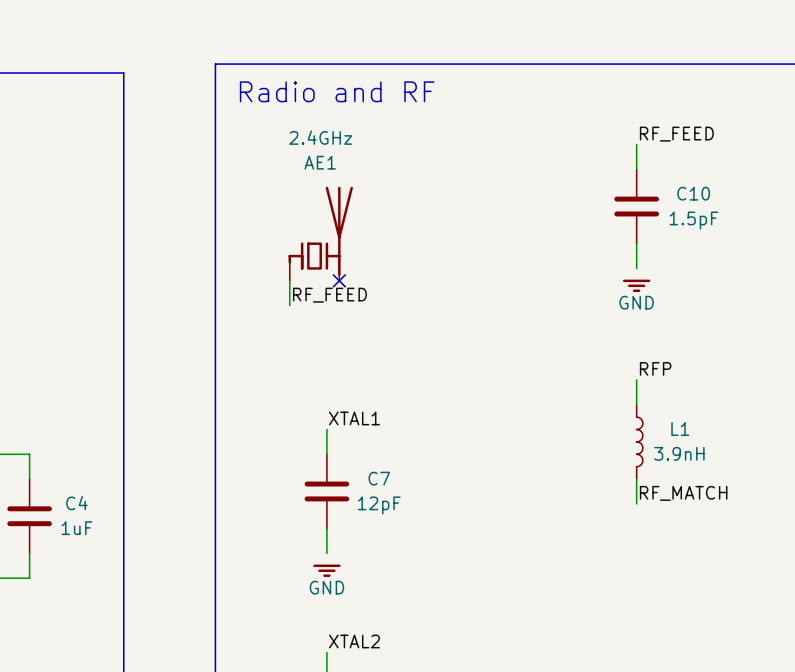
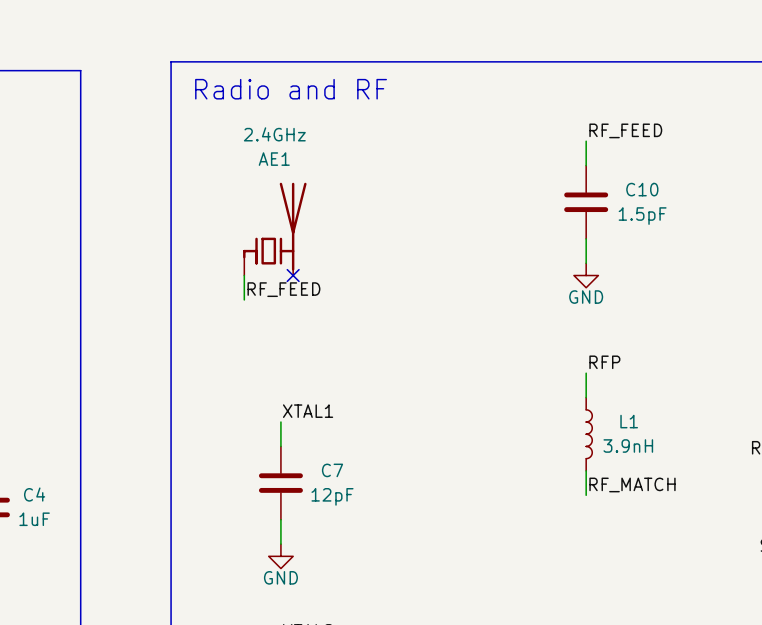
power symbol shape: [623, 279, 651, 293] -> [573, 263, 599, 288]
power symbol shape: [313, 564, 341, 577] -> [268, 544, 294, 569]

